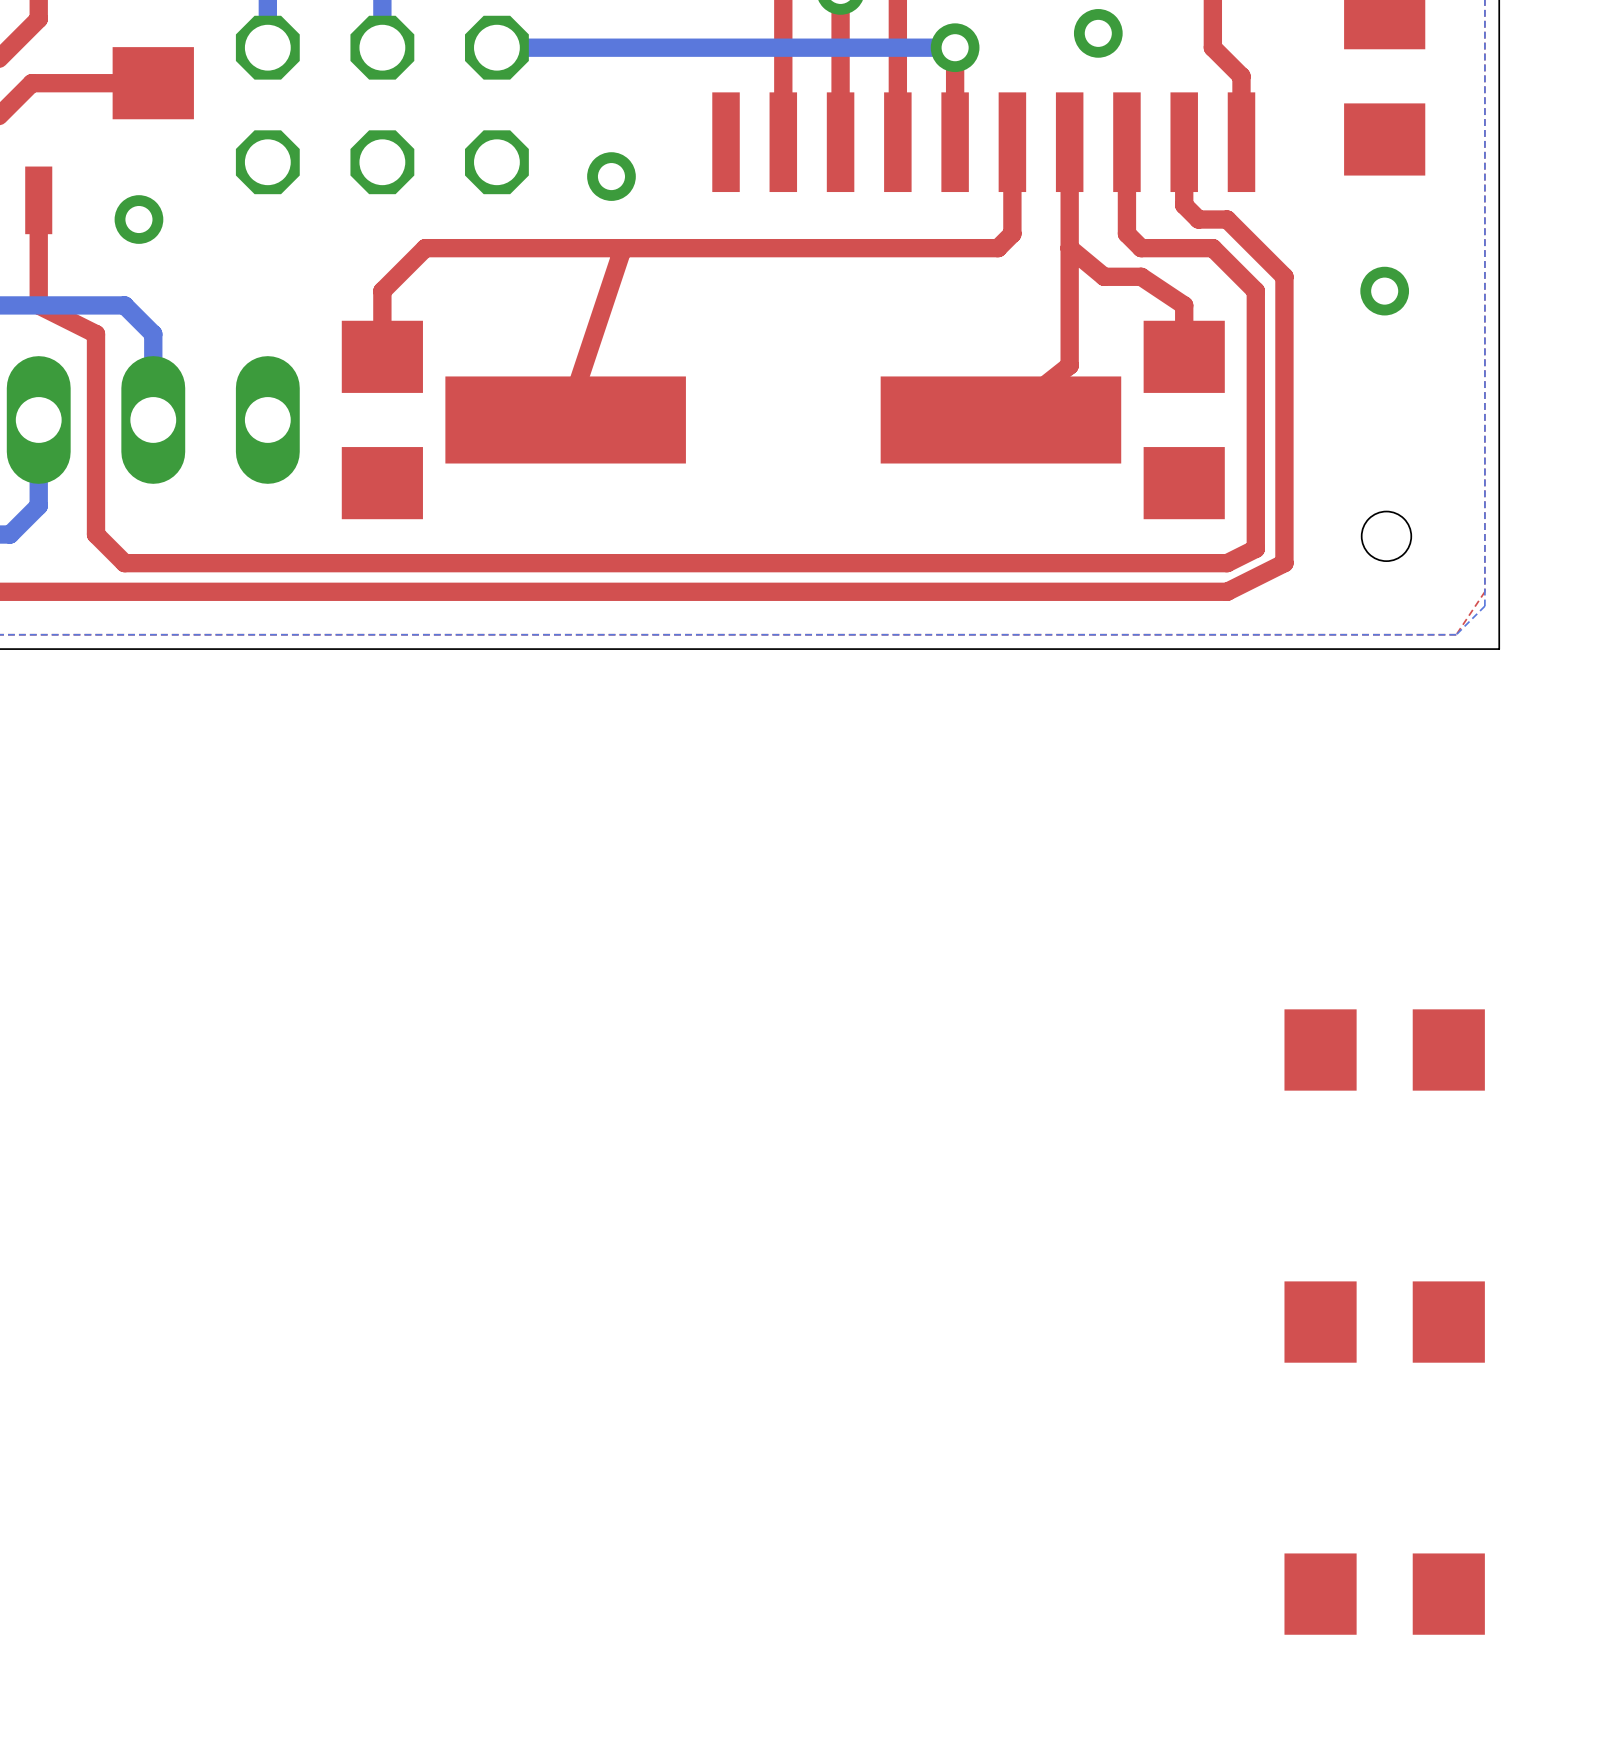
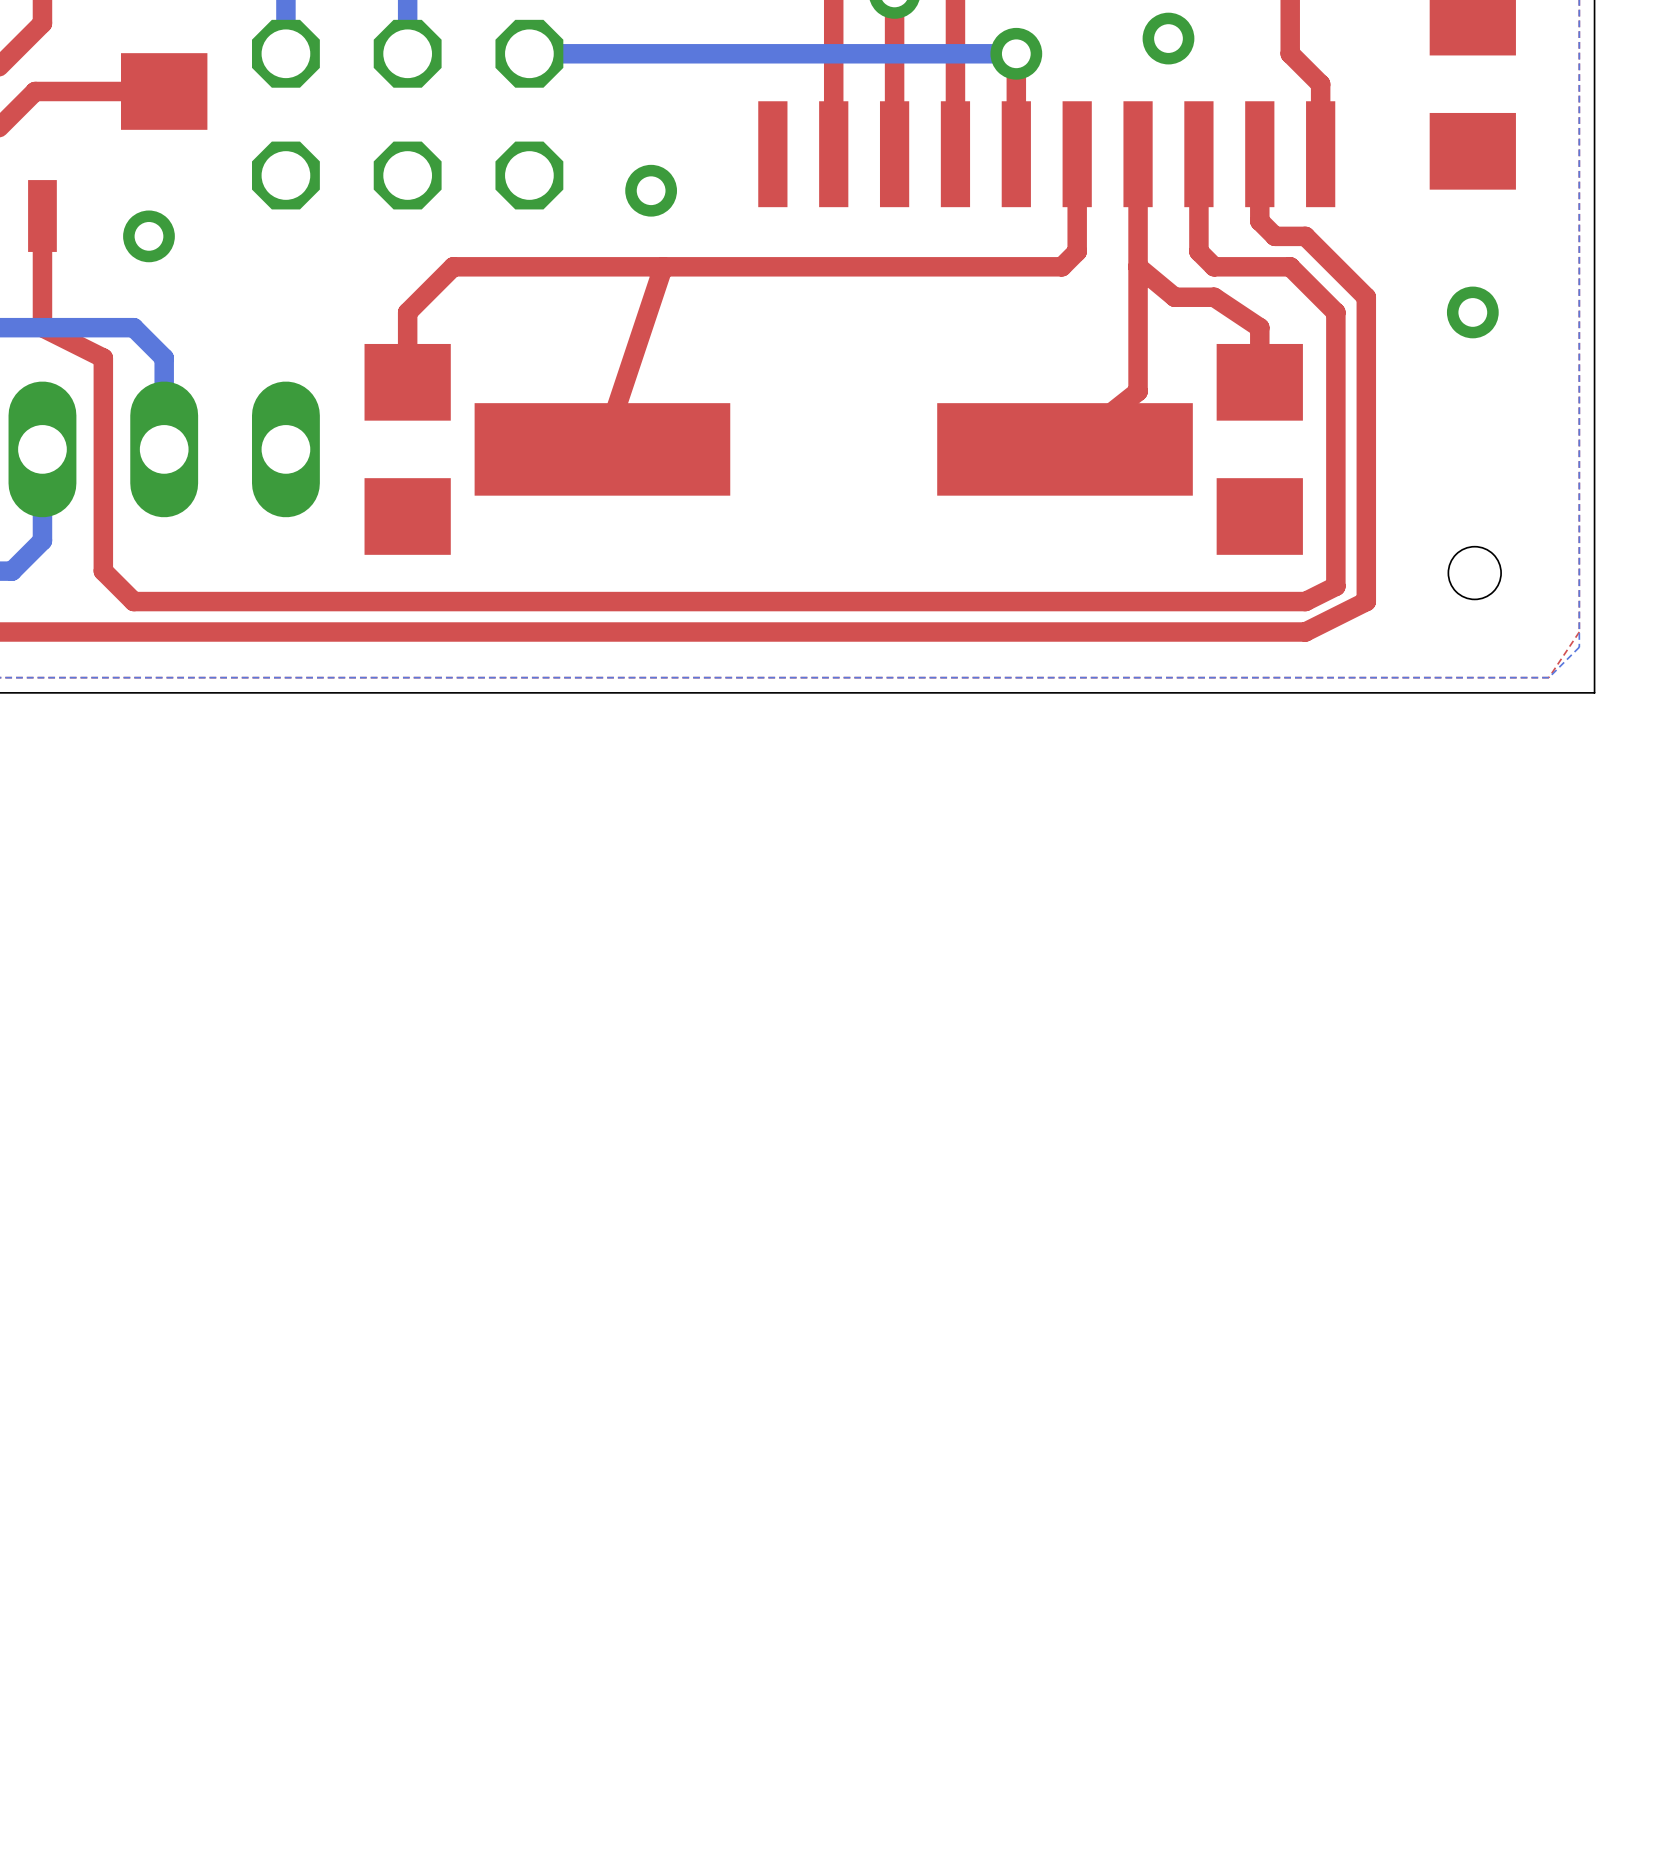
part: (1384, 1050) -> none
part: (1384, 1322) -> none
part: (1384, 1594) -> none

